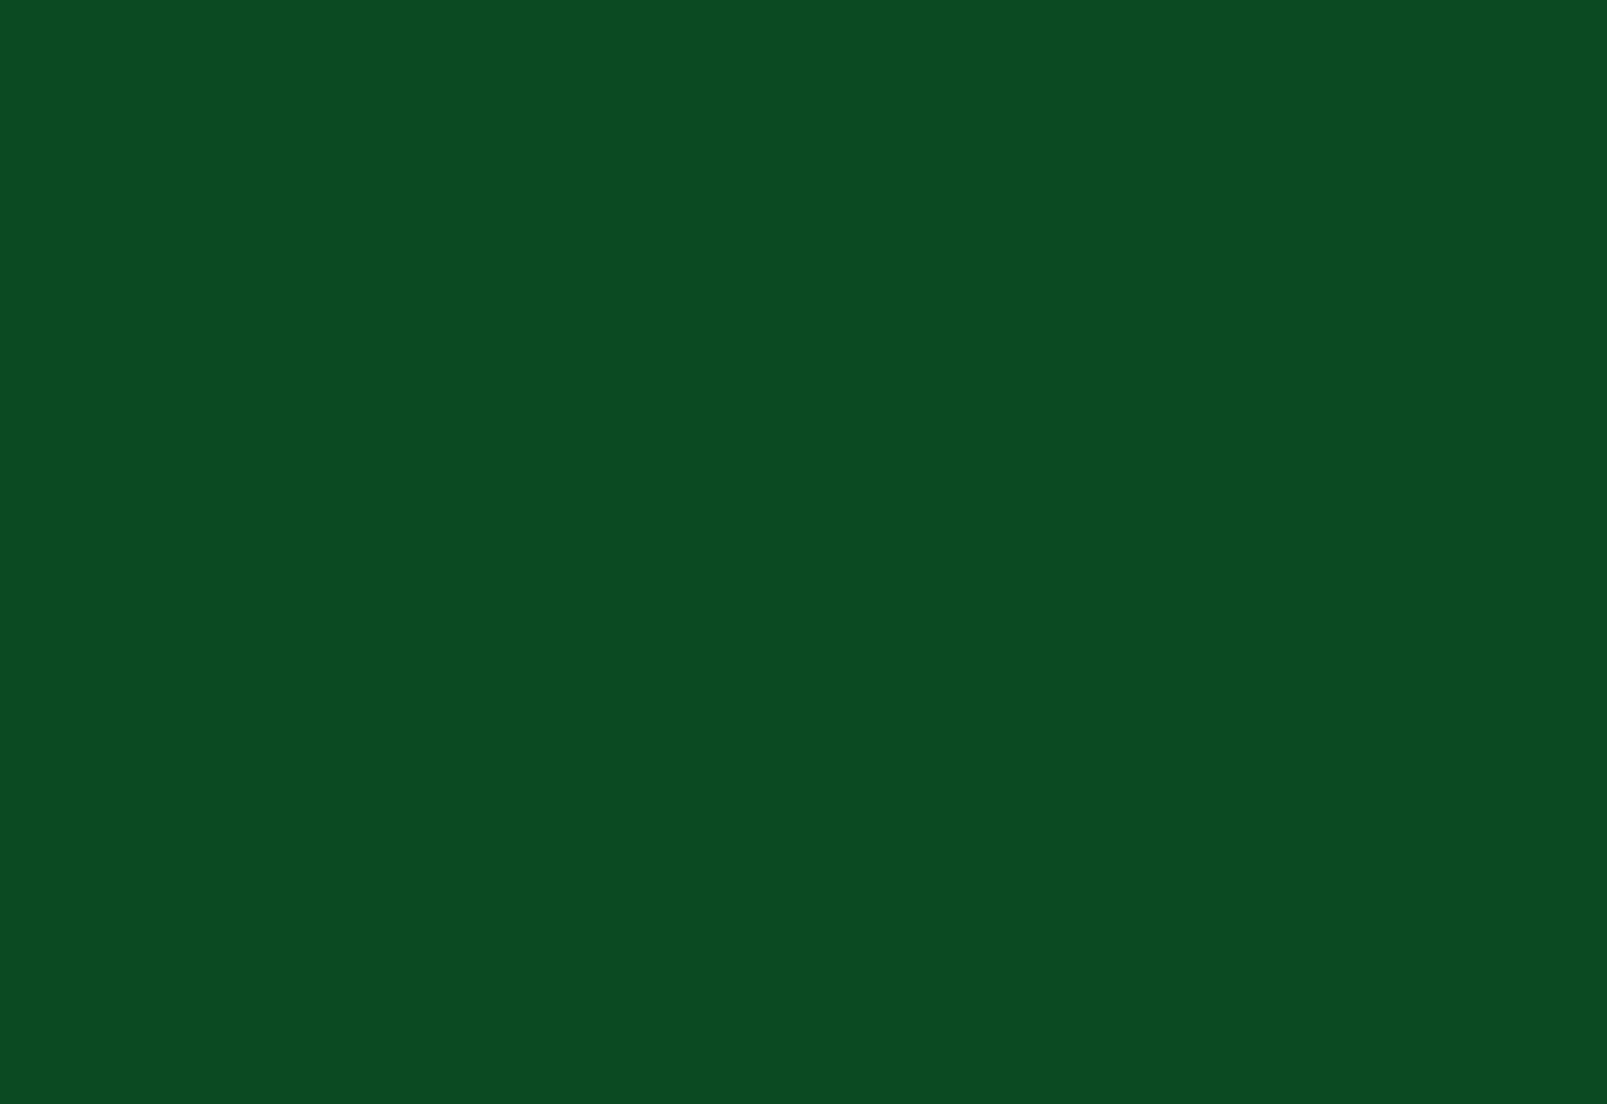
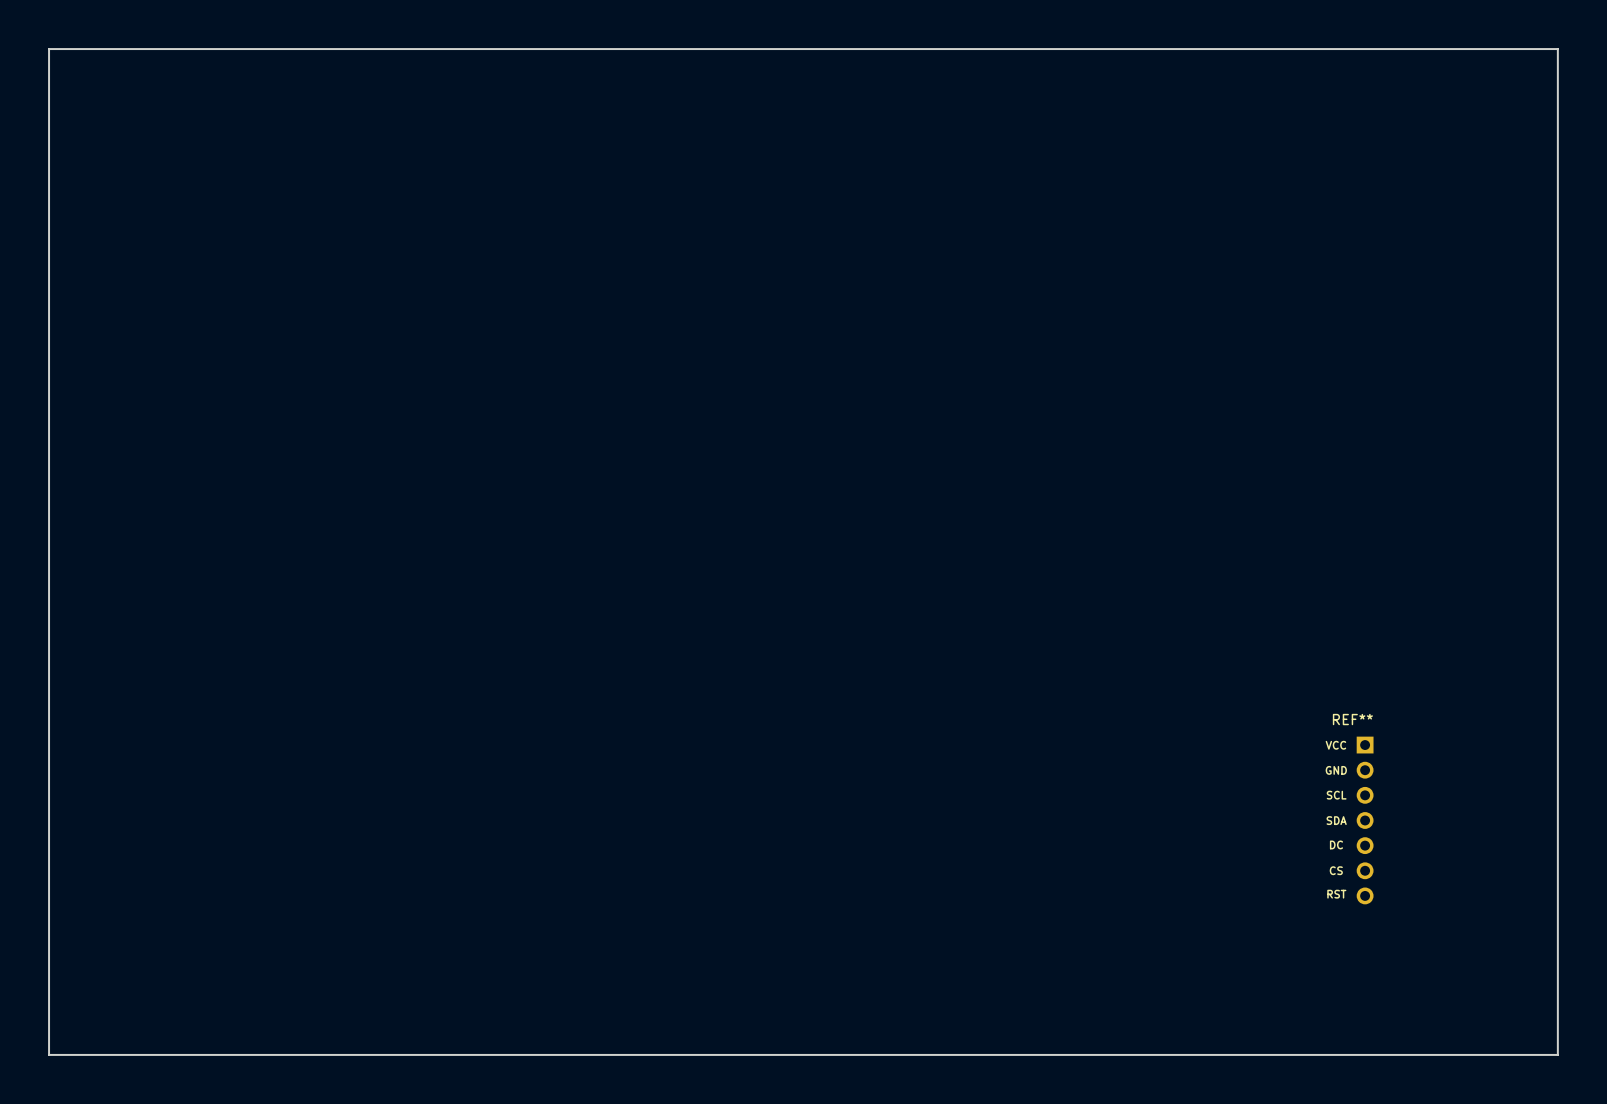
drawing: none -> [48, 48, 1559, 1056]
REF**: none -> (1365, 820)

